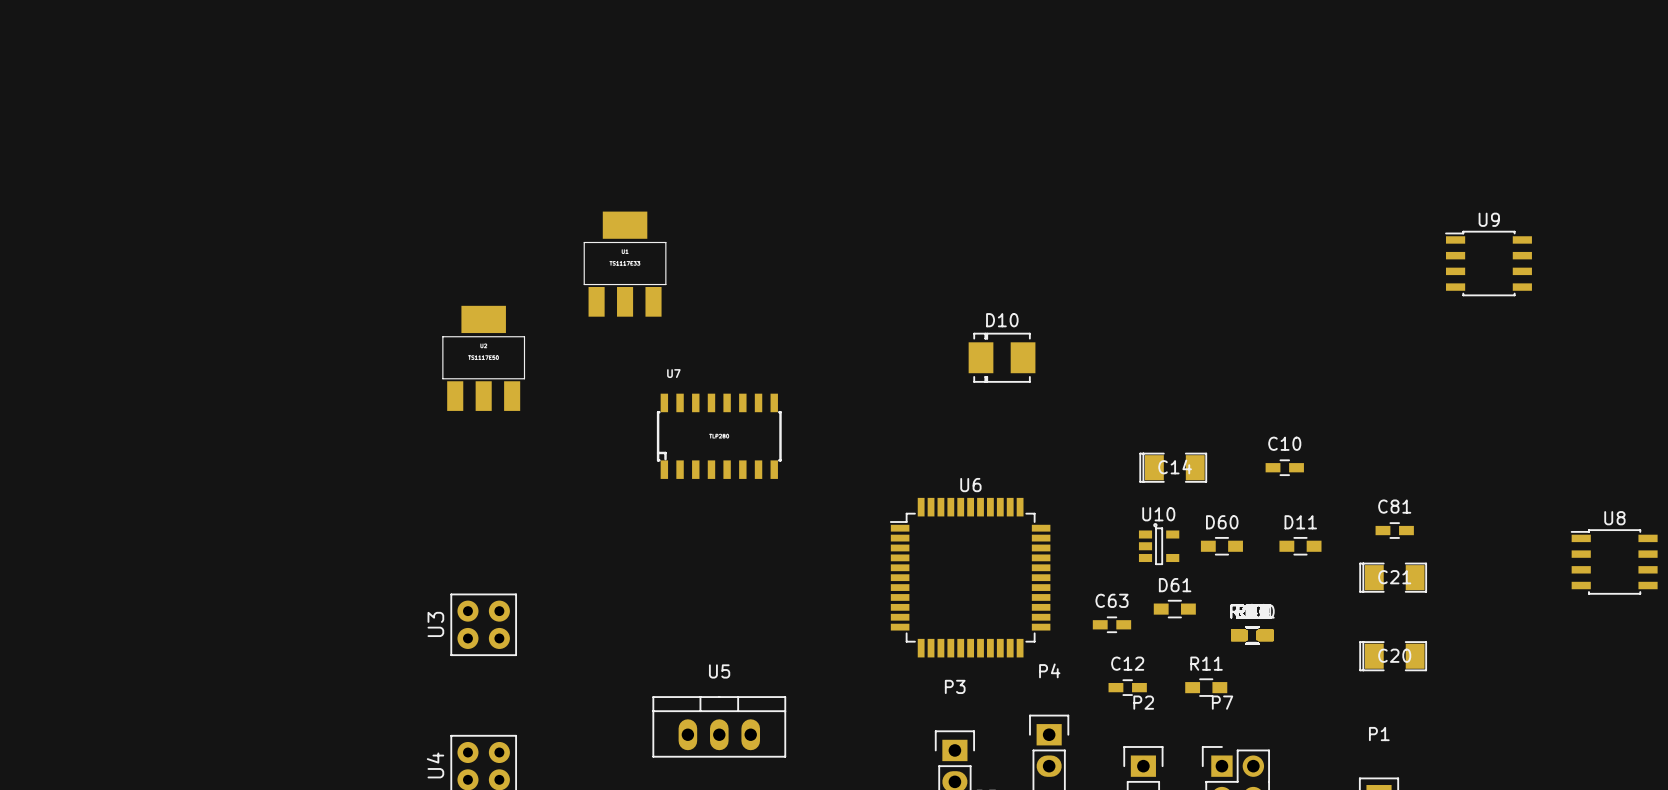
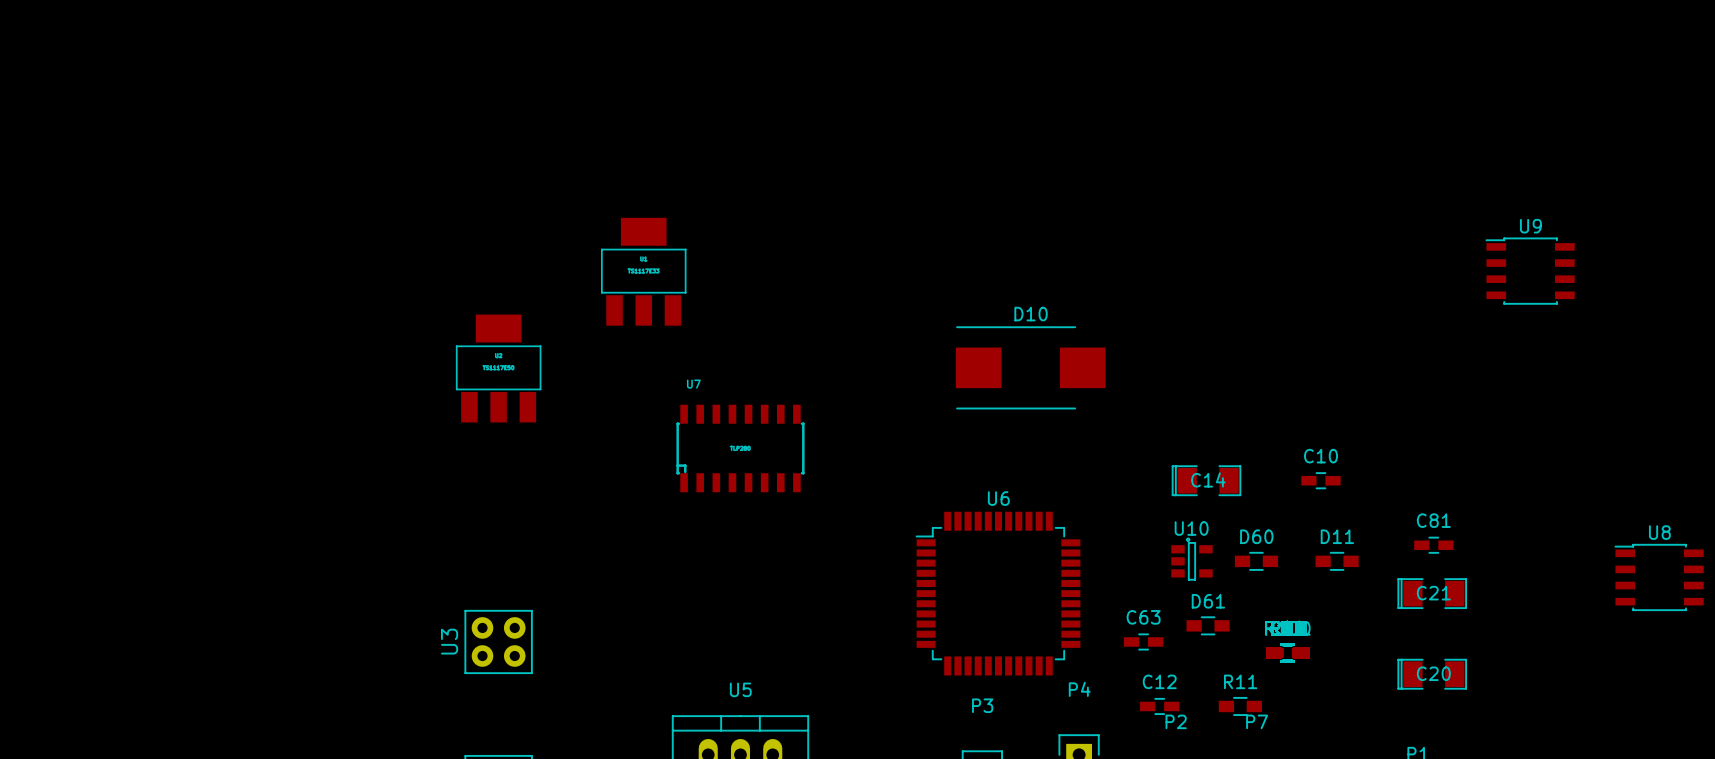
D10 footprint: [968, 332, 1036, 383] -> [955, 326, 1106, 410]

